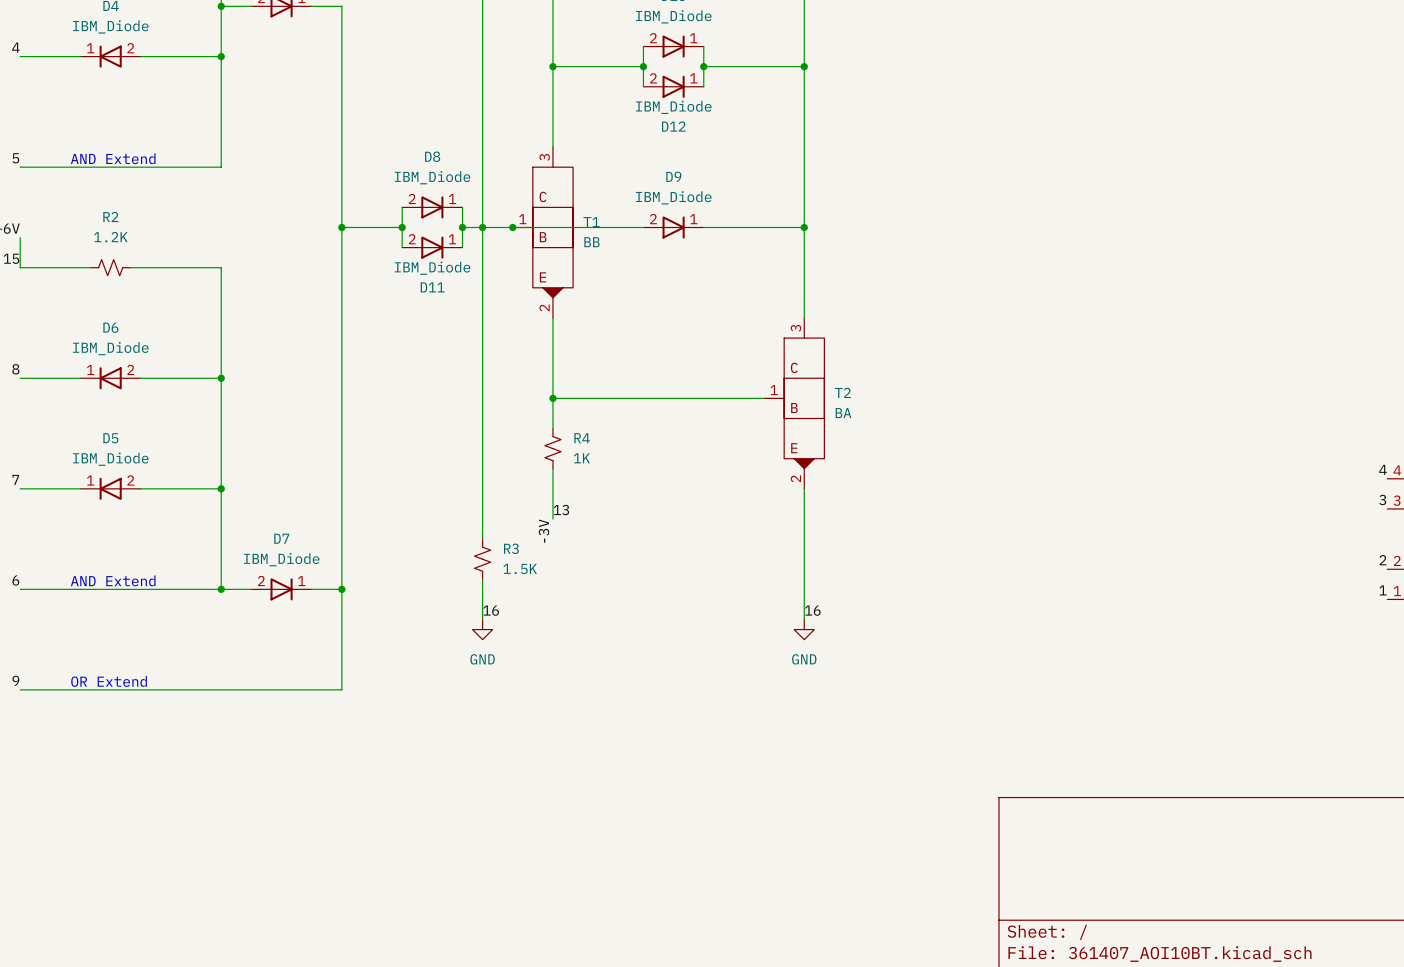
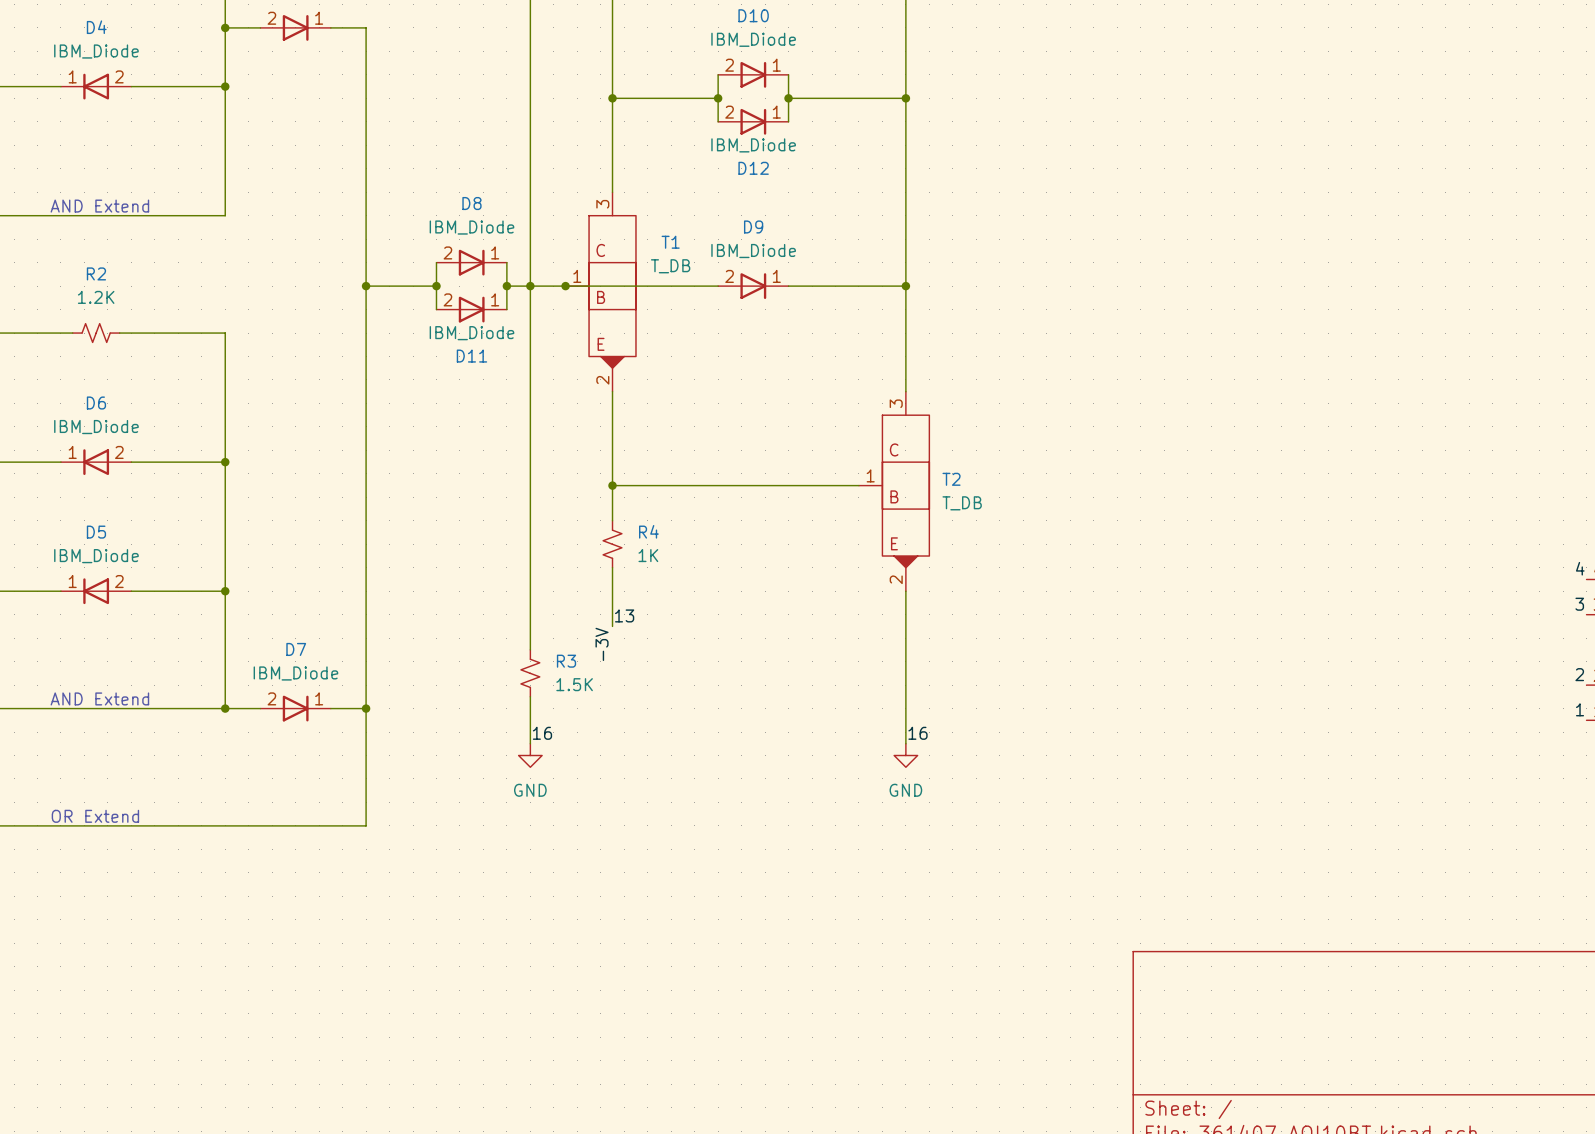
T1 name position: T1 (591, 222) -> T1 (670, 242)
T1 value: BB (591, 242) -> T_DB (670, 266)
T2 value: BA (843, 413) -> T_DB (962, 503)

